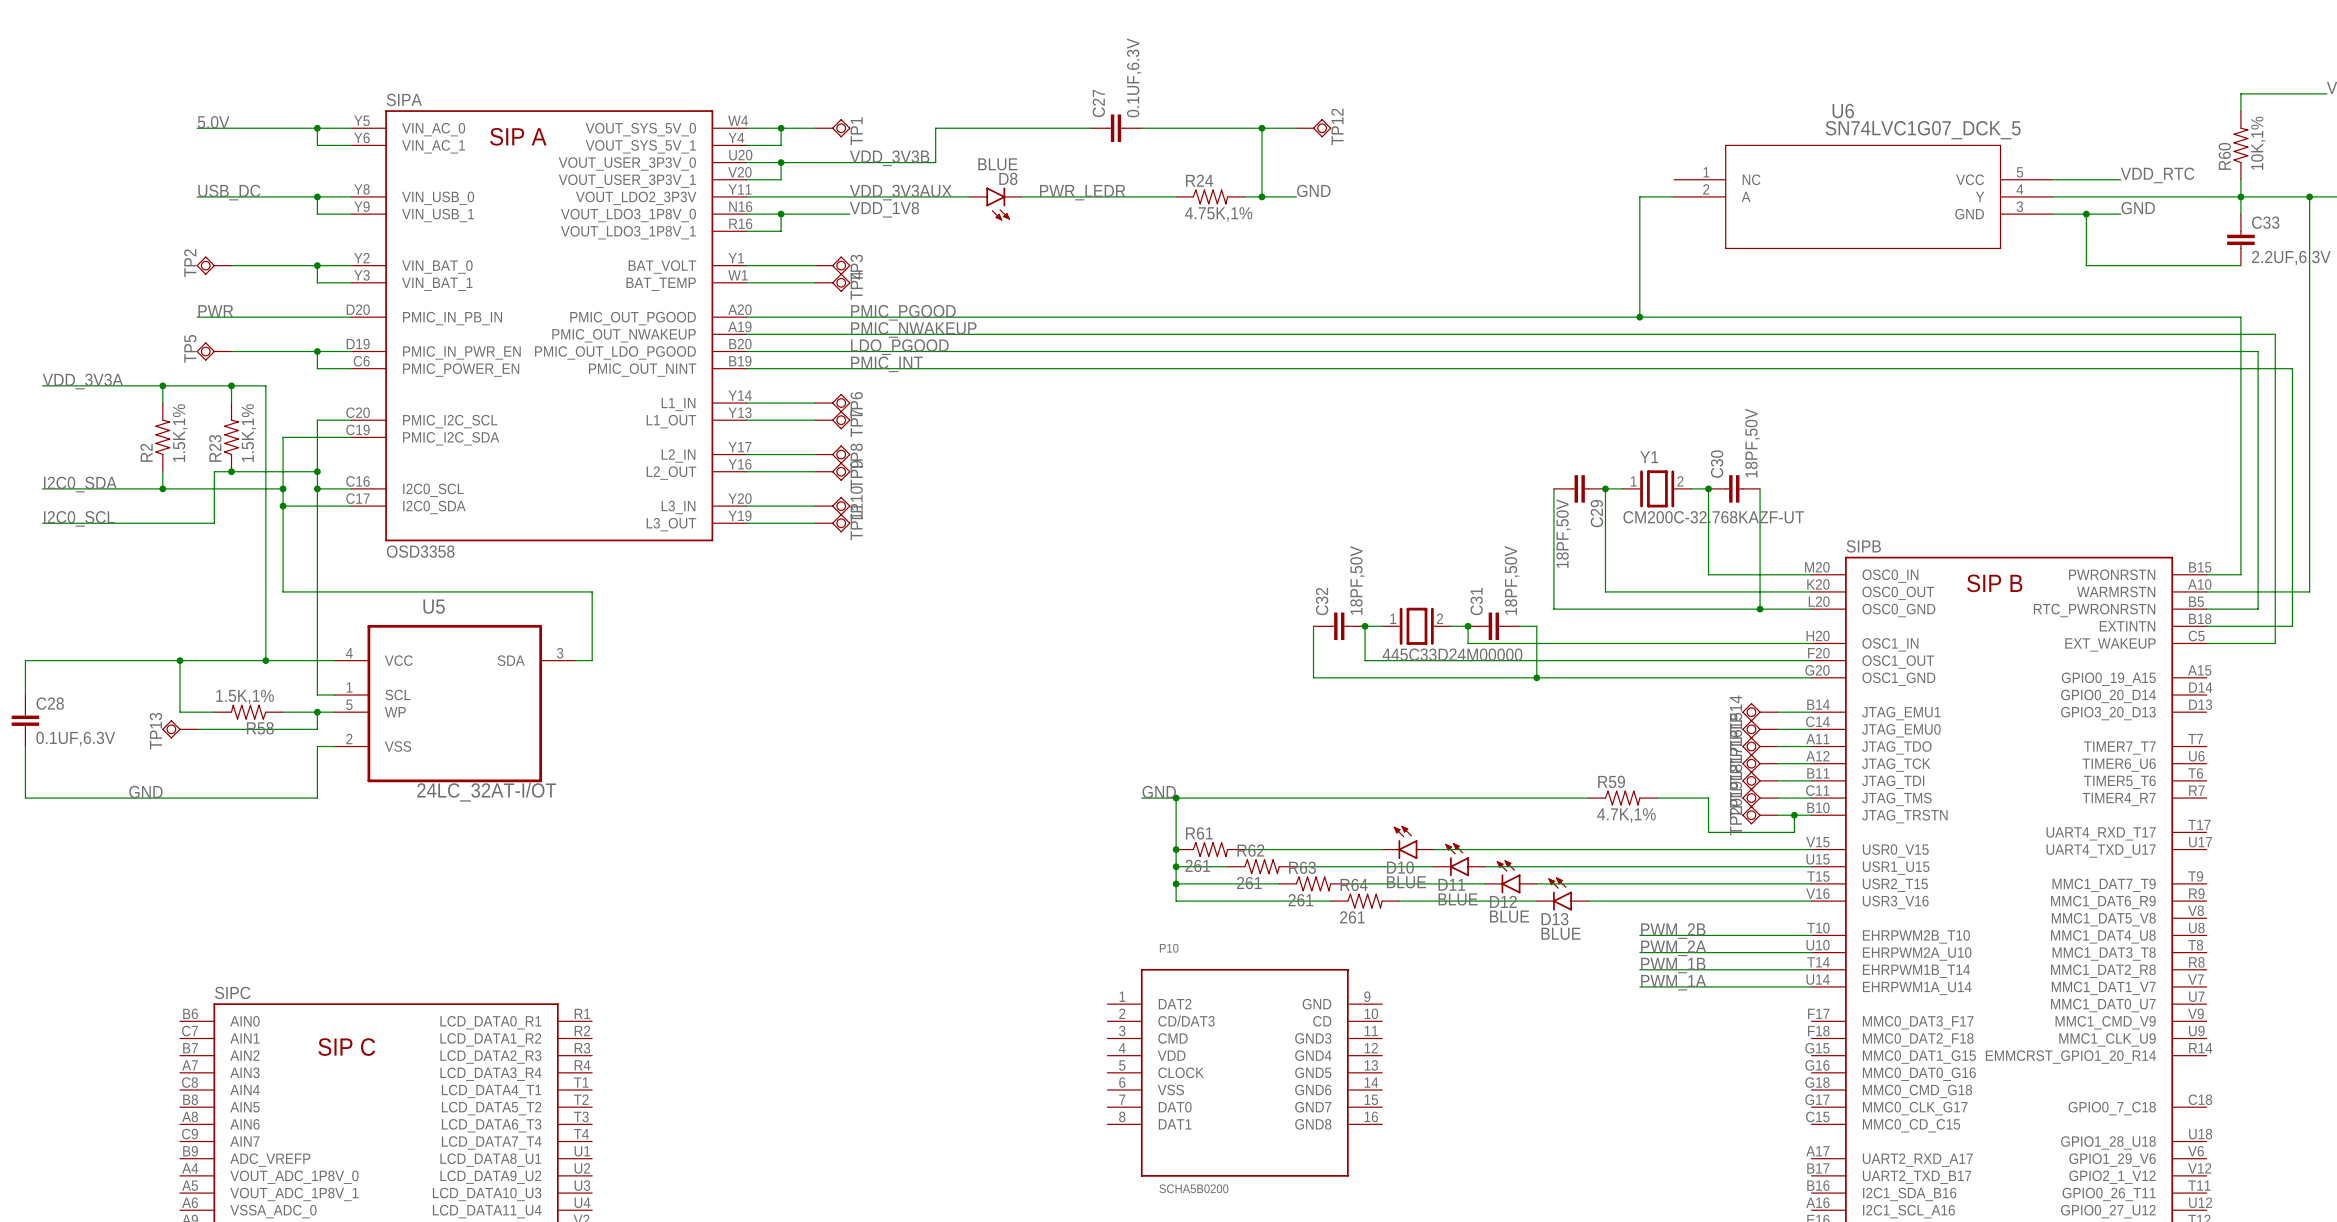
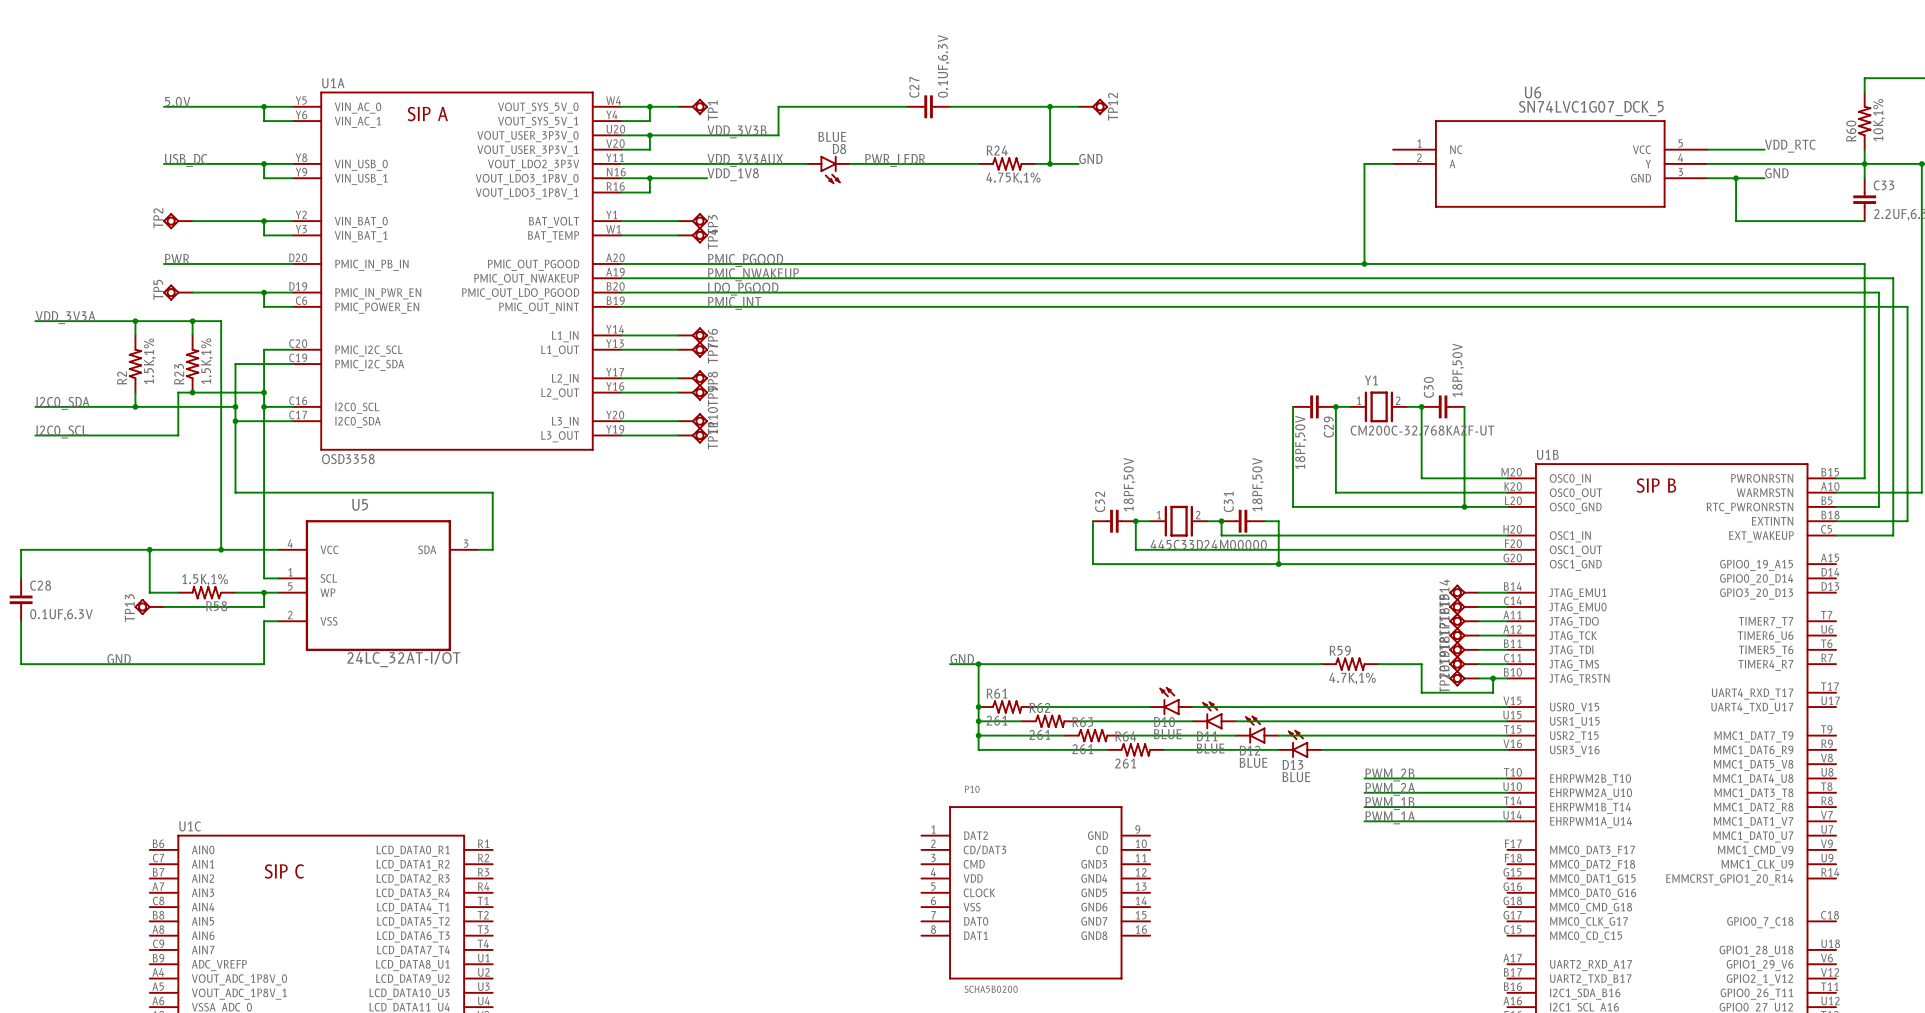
SIPA name: SIPA (404, 99) -> U1A (333, 83)
SIPB name: SIPB (1863, 546) -> U1B (1547, 454)
SIPC name: SIPC (232, 992) -> U1C (190, 826)

